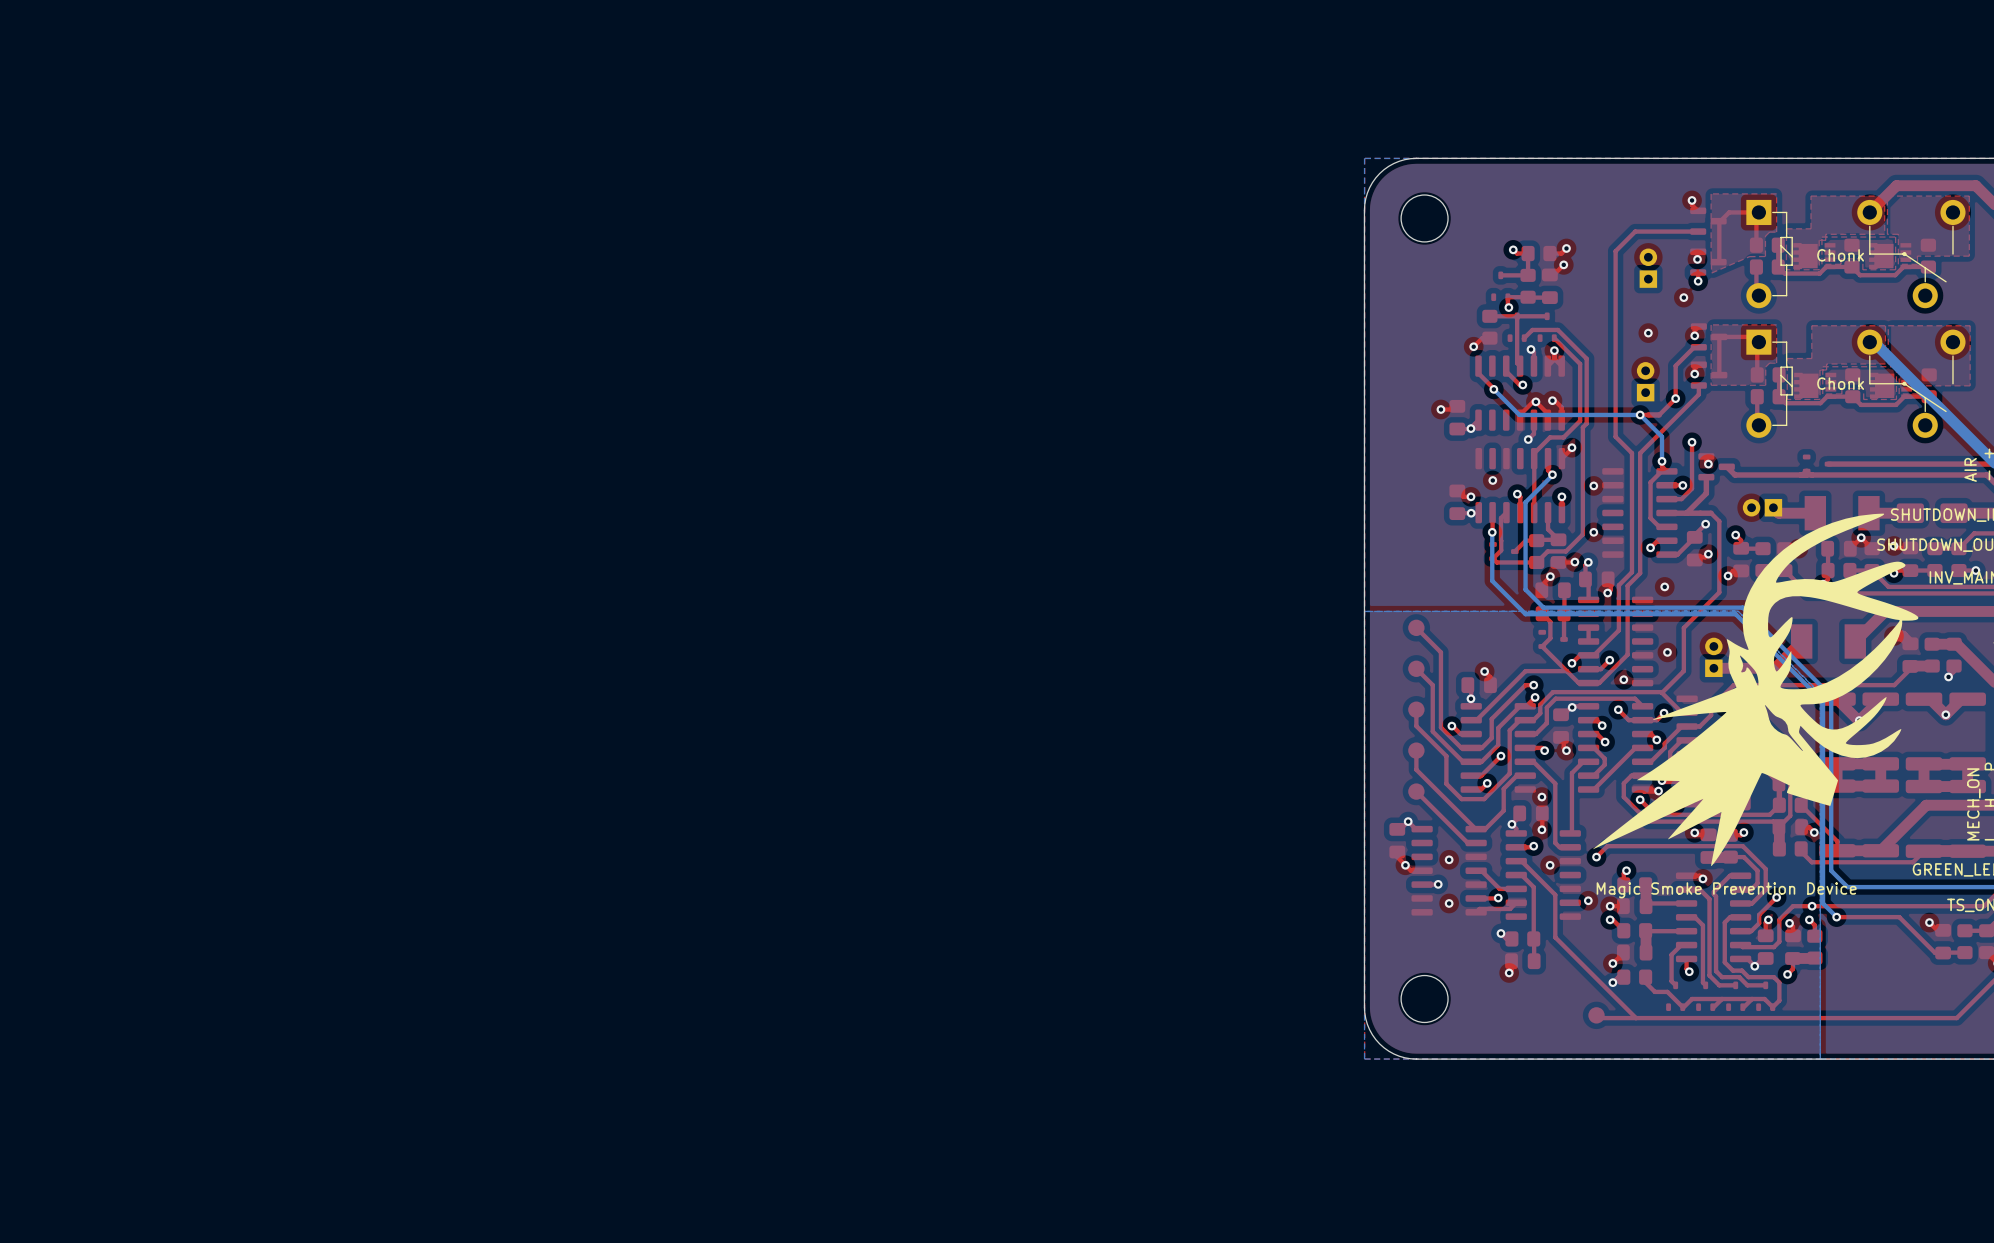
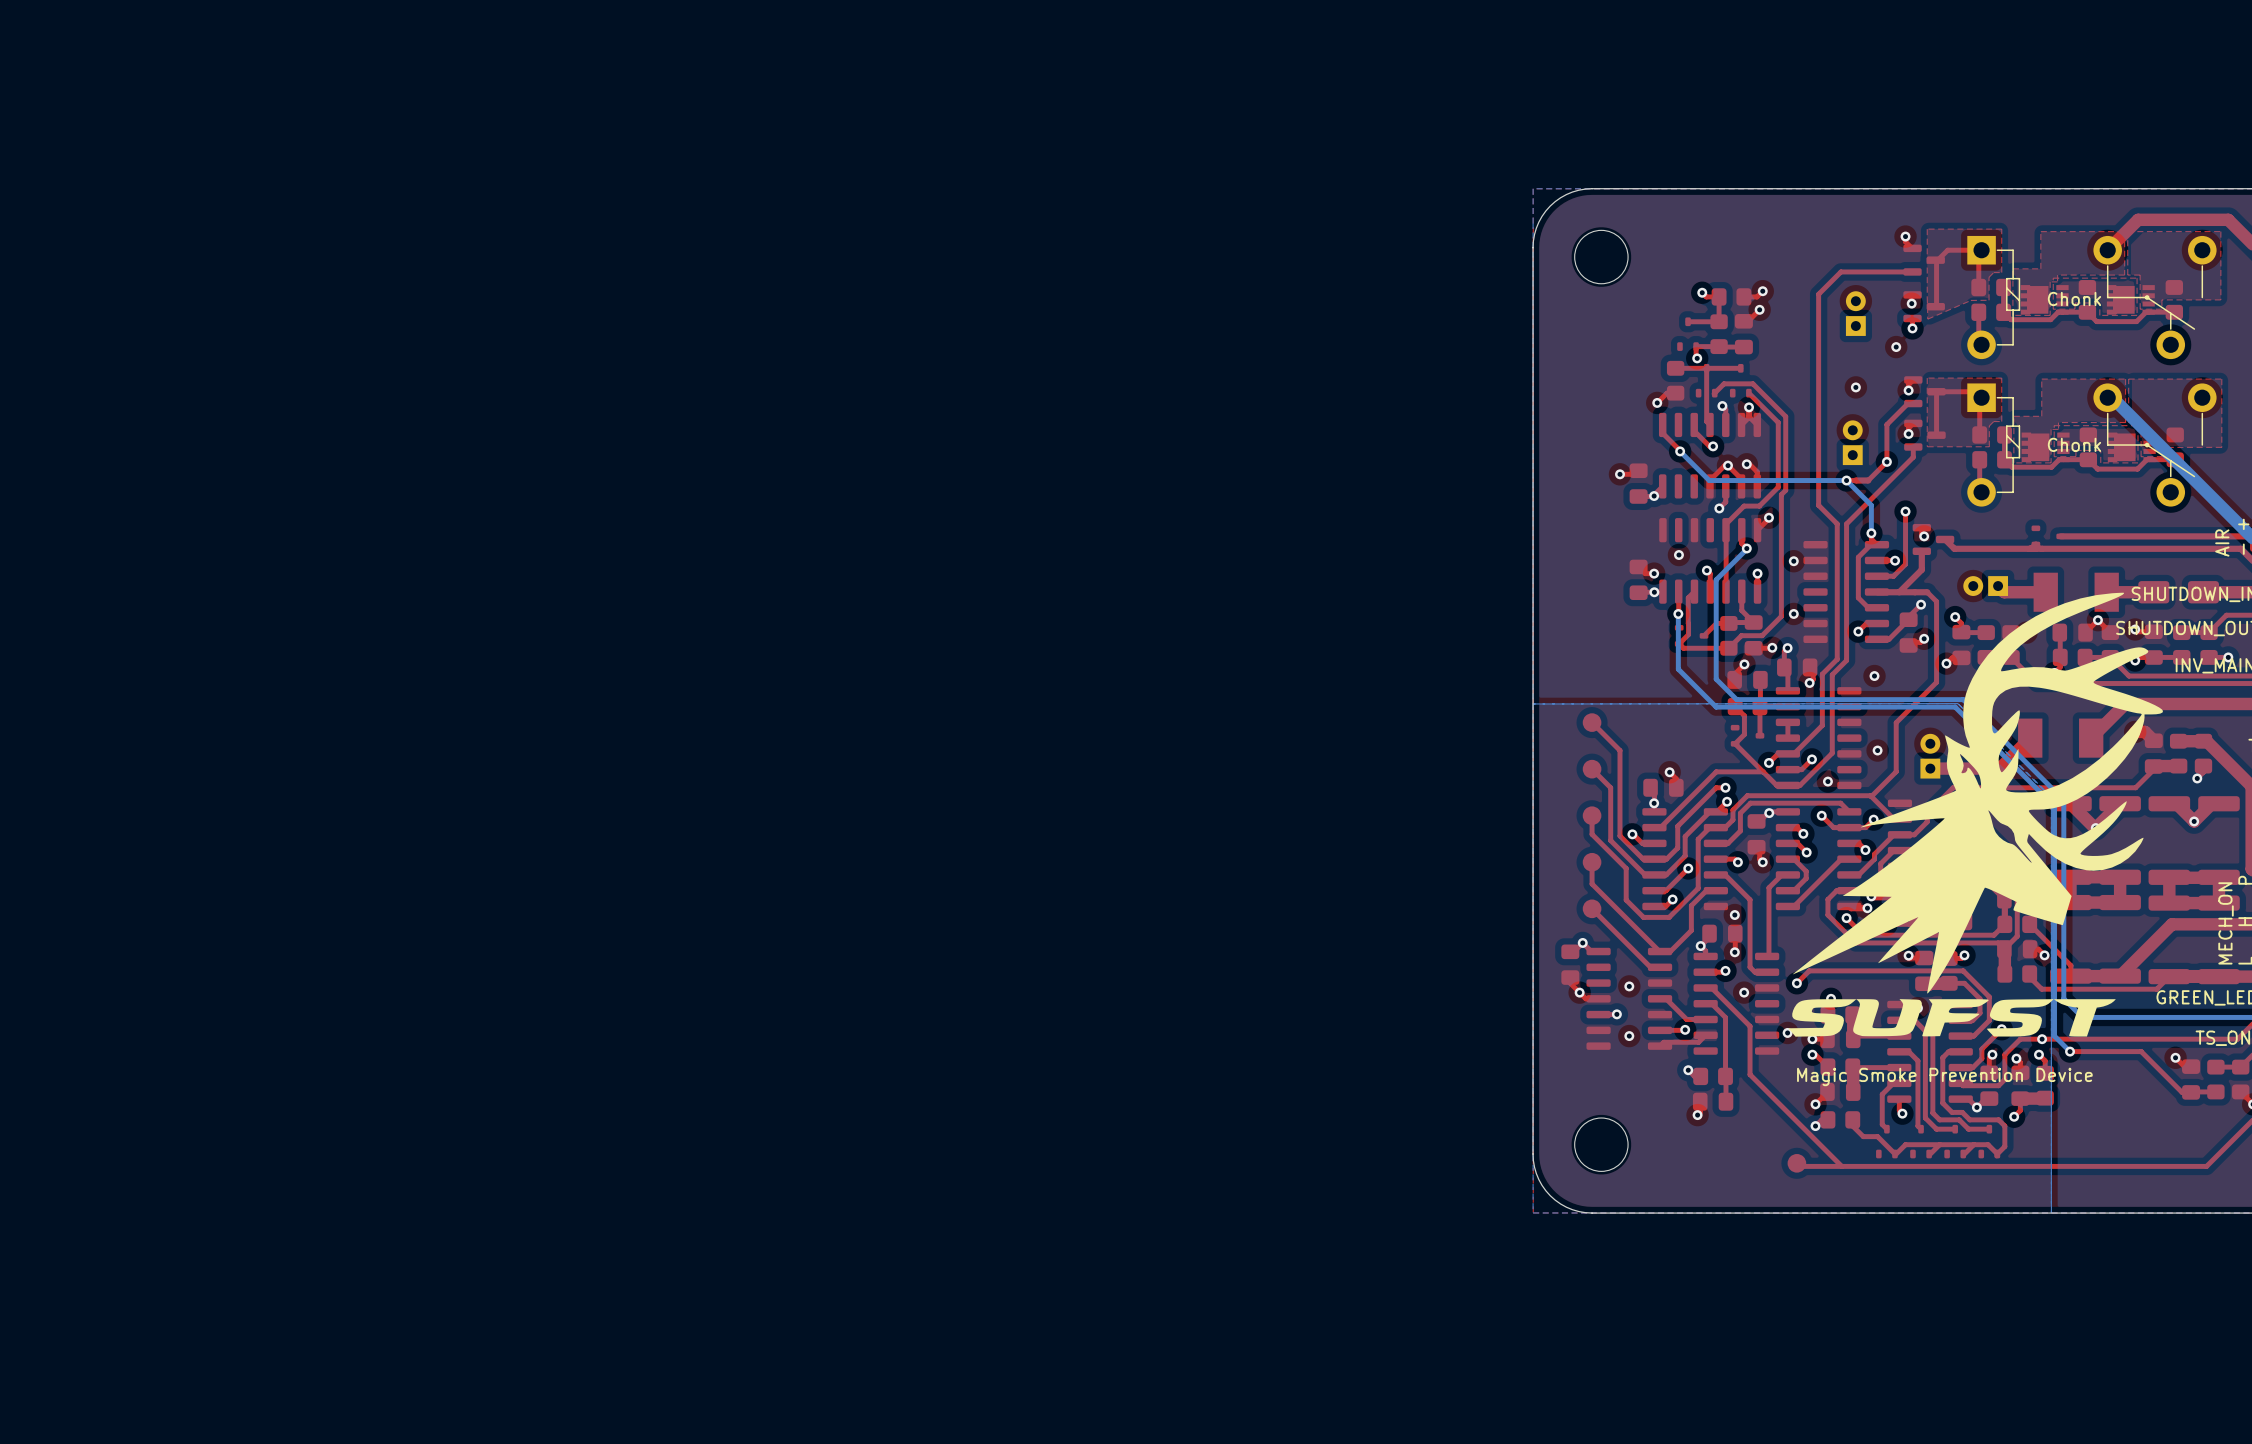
drawing: none -> [1788, 999, 2116, 1037]
text position: Magic Smoke Prevention Device (1726, 890) -> Magic Smoke Prevention Device (1944, 1076)

